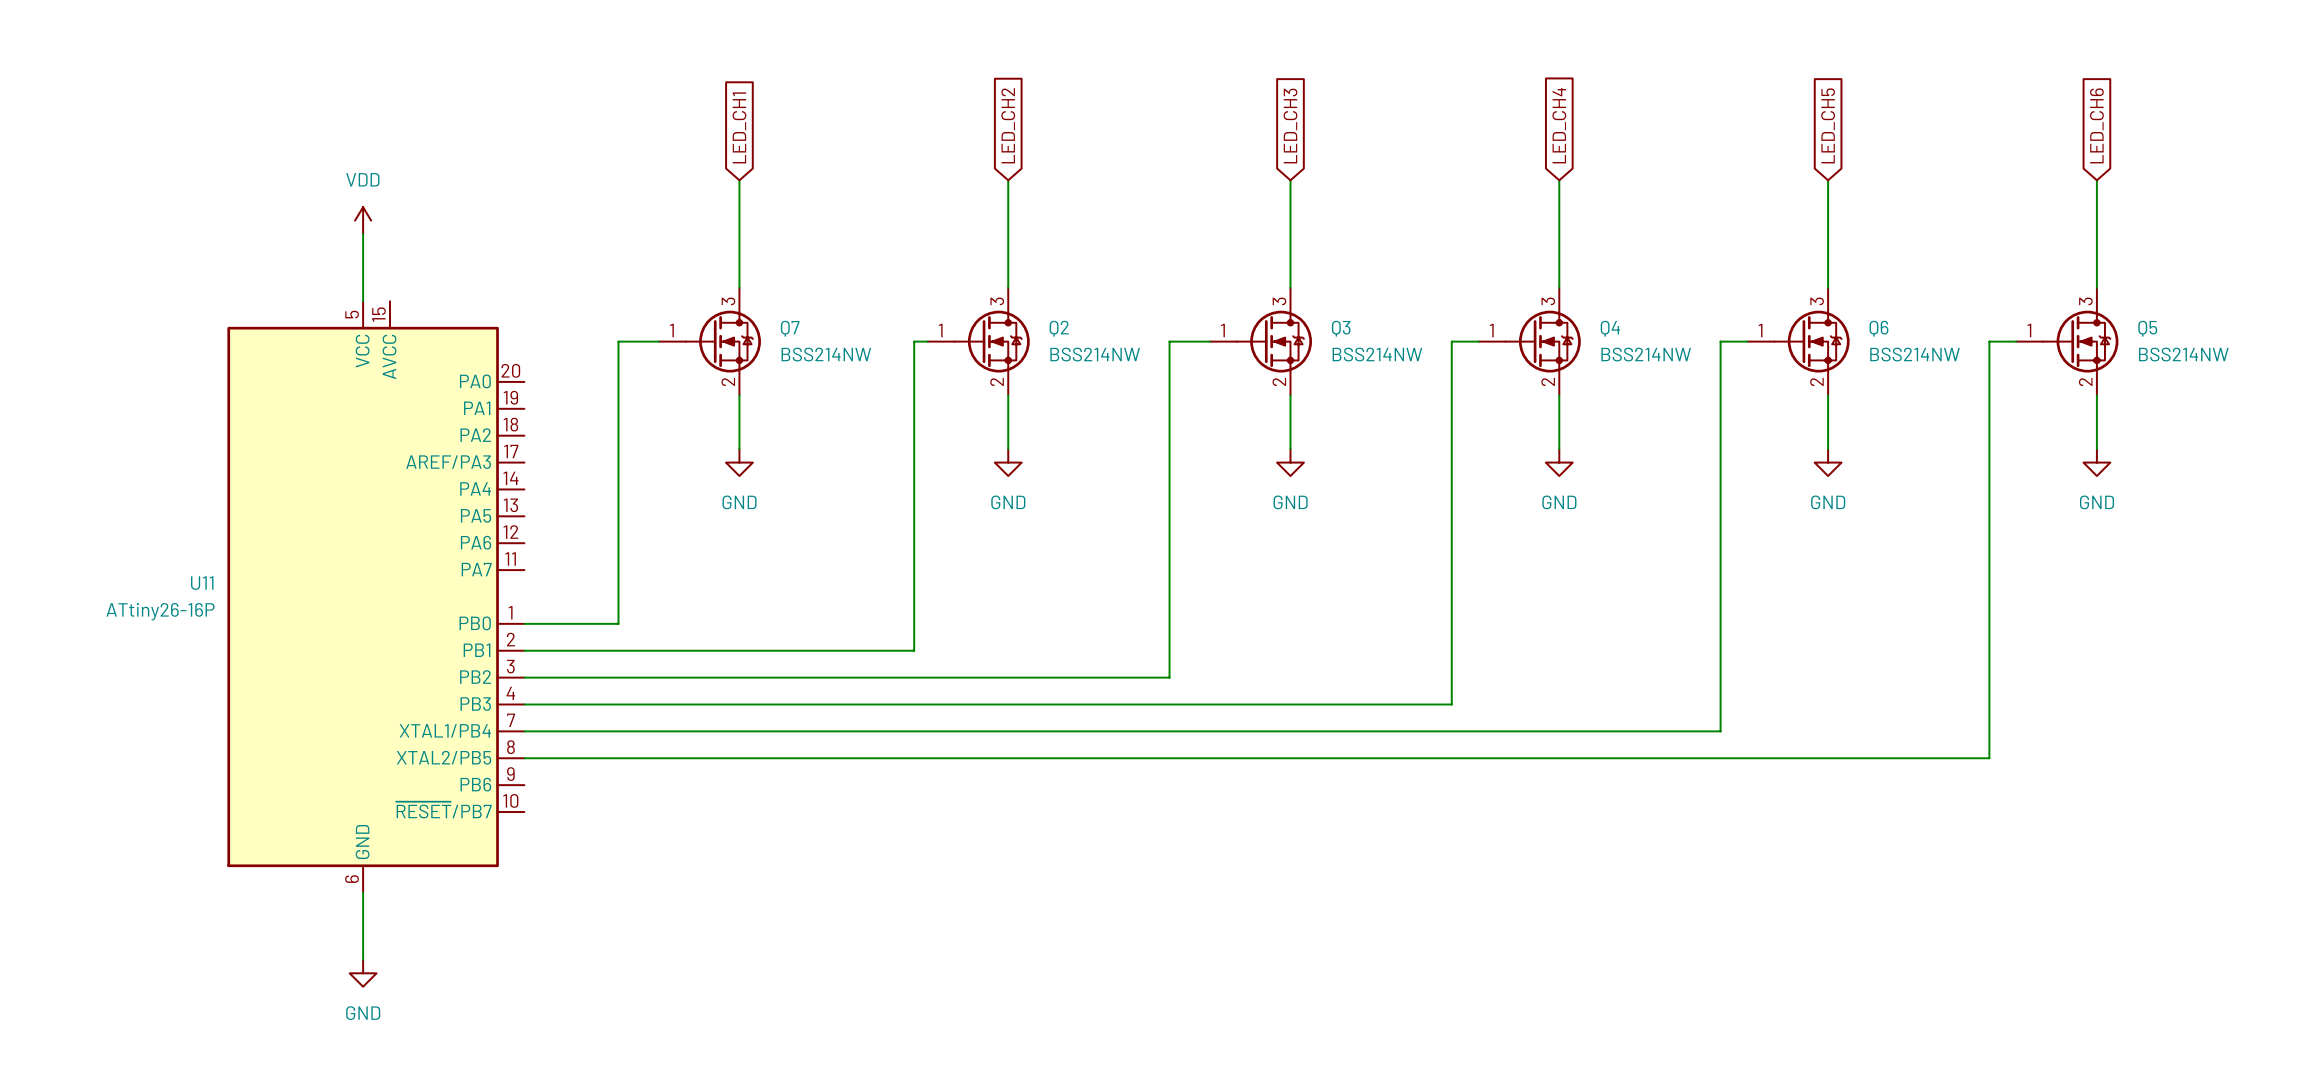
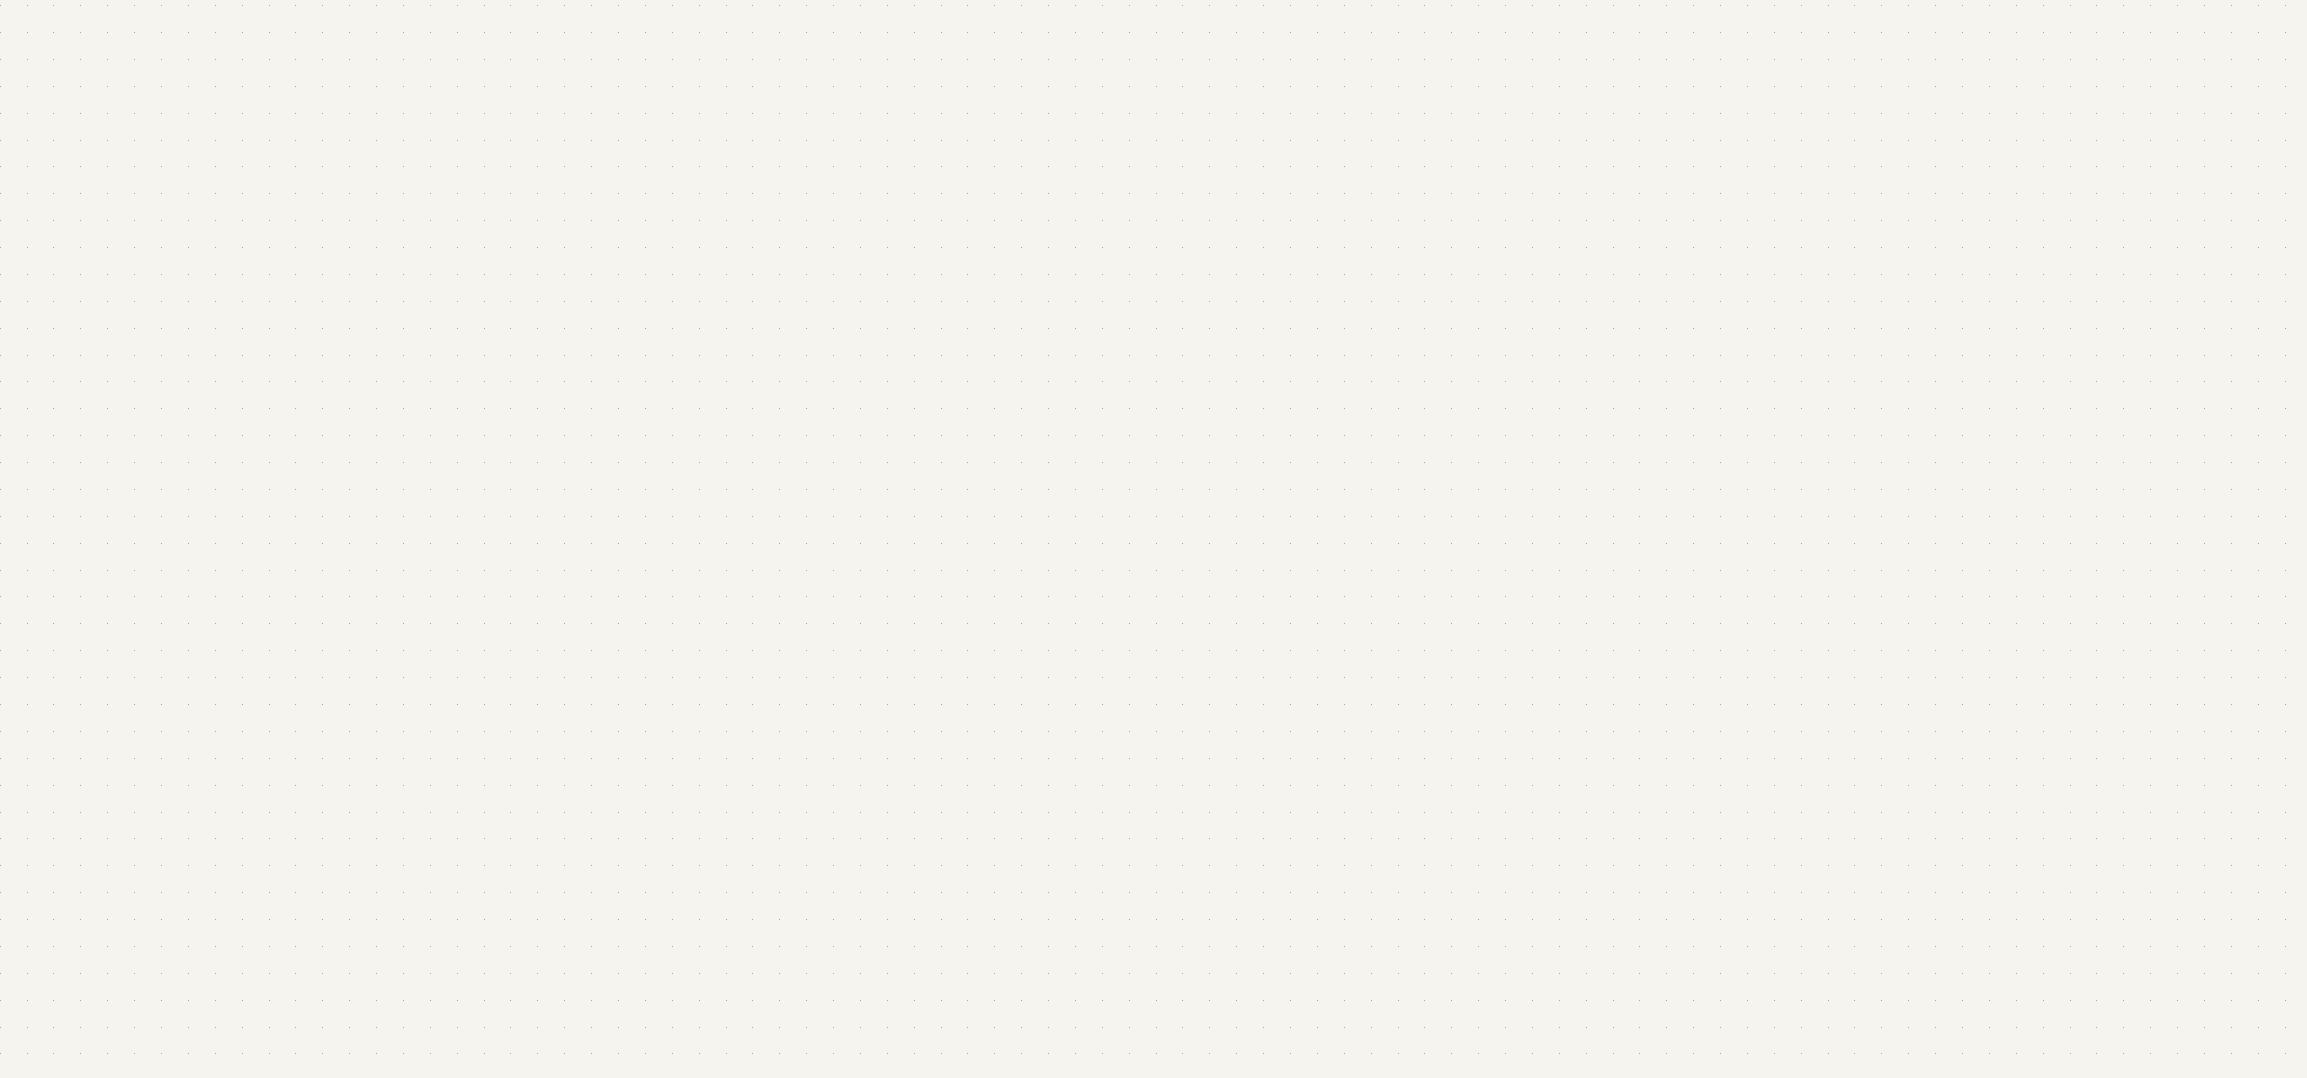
global label: LED_CH2 (1008, 125) -> none
global label: LED_CH4 (1559, 125) -> none
global label: LED_CH5 (1828, 125) -> none
global label: LED_CH6 (2096, 125) -> none
global label: LED_CH3 (1290, 126) -> none
global label: LED_CH1 (739, 127) -> none
wire: (739, 180) (739, 287) -> none
wire: (1008, 180) (1008, 287) -> none
wire: (1290, 180) (1290, 287) -> none
wire: (1559, 180) (1559, 287) -> none
wire: (1828, 180) (1828, 287) -> none
wire: (2096, 180) (2096, 287) -> none
power symbol: VDD (363, 220) -> none
wire: (363, 234) (363, 301) -> none
wire: (658, 341) (618, 341) (618, 623) (524, 623) -> none
Q7: BSS214NW (709, 341) -> none
wire: (927, 341) (914, 341) (914, 650) (524, 650) -> none
Q2: BSS214NW (978, 341) -> none
wire: (1209, 341) (1169, 341) (1169, 677) (524, 677) -> none
Q3: BSS214NW (1260, 341) -> none
wire: (1478, 341) (1451, 341) (1451, 704) (524, 704) -> none
Q4: BSS214NW (1529, 341) -> none
wire: (1747, 341) (1720, 341) (1720, 731) (524, 731) -> none
Q6: BSS214NW (1798, 341) -> none
wire: (2016, 341) (1989, 341) (1989, 758) (524, 758) -> none
Q5: BSS214NW (2067, 341) -> none
wire: (739, 395) (739, 449) -> none
wire: (1008, 395) (1008, 449) -> none
wire: (1290, 395) (1290, 449) -> none
wire: (1559, 395) (1559, 449) -> none
wire: (1828, 395) (1828, 449) -> none
wire: (2096, 395) (2096, 449) -> none
power symbol: GND (739, 462) -> none
power symbol: GND (1008, 462) -> none
power symbol: GND (1290, 462) -> none
power symbol: GND (1559, 462) -> none
power symbol: GND (1828, 462) -> none
power symbol: GND (2096, 462) -> none
U11: ATtiny26-16P (375, 596) -> none
wire: (363, 892) (363, 959) -> none
power symbol: GND (363, 973) -> none

